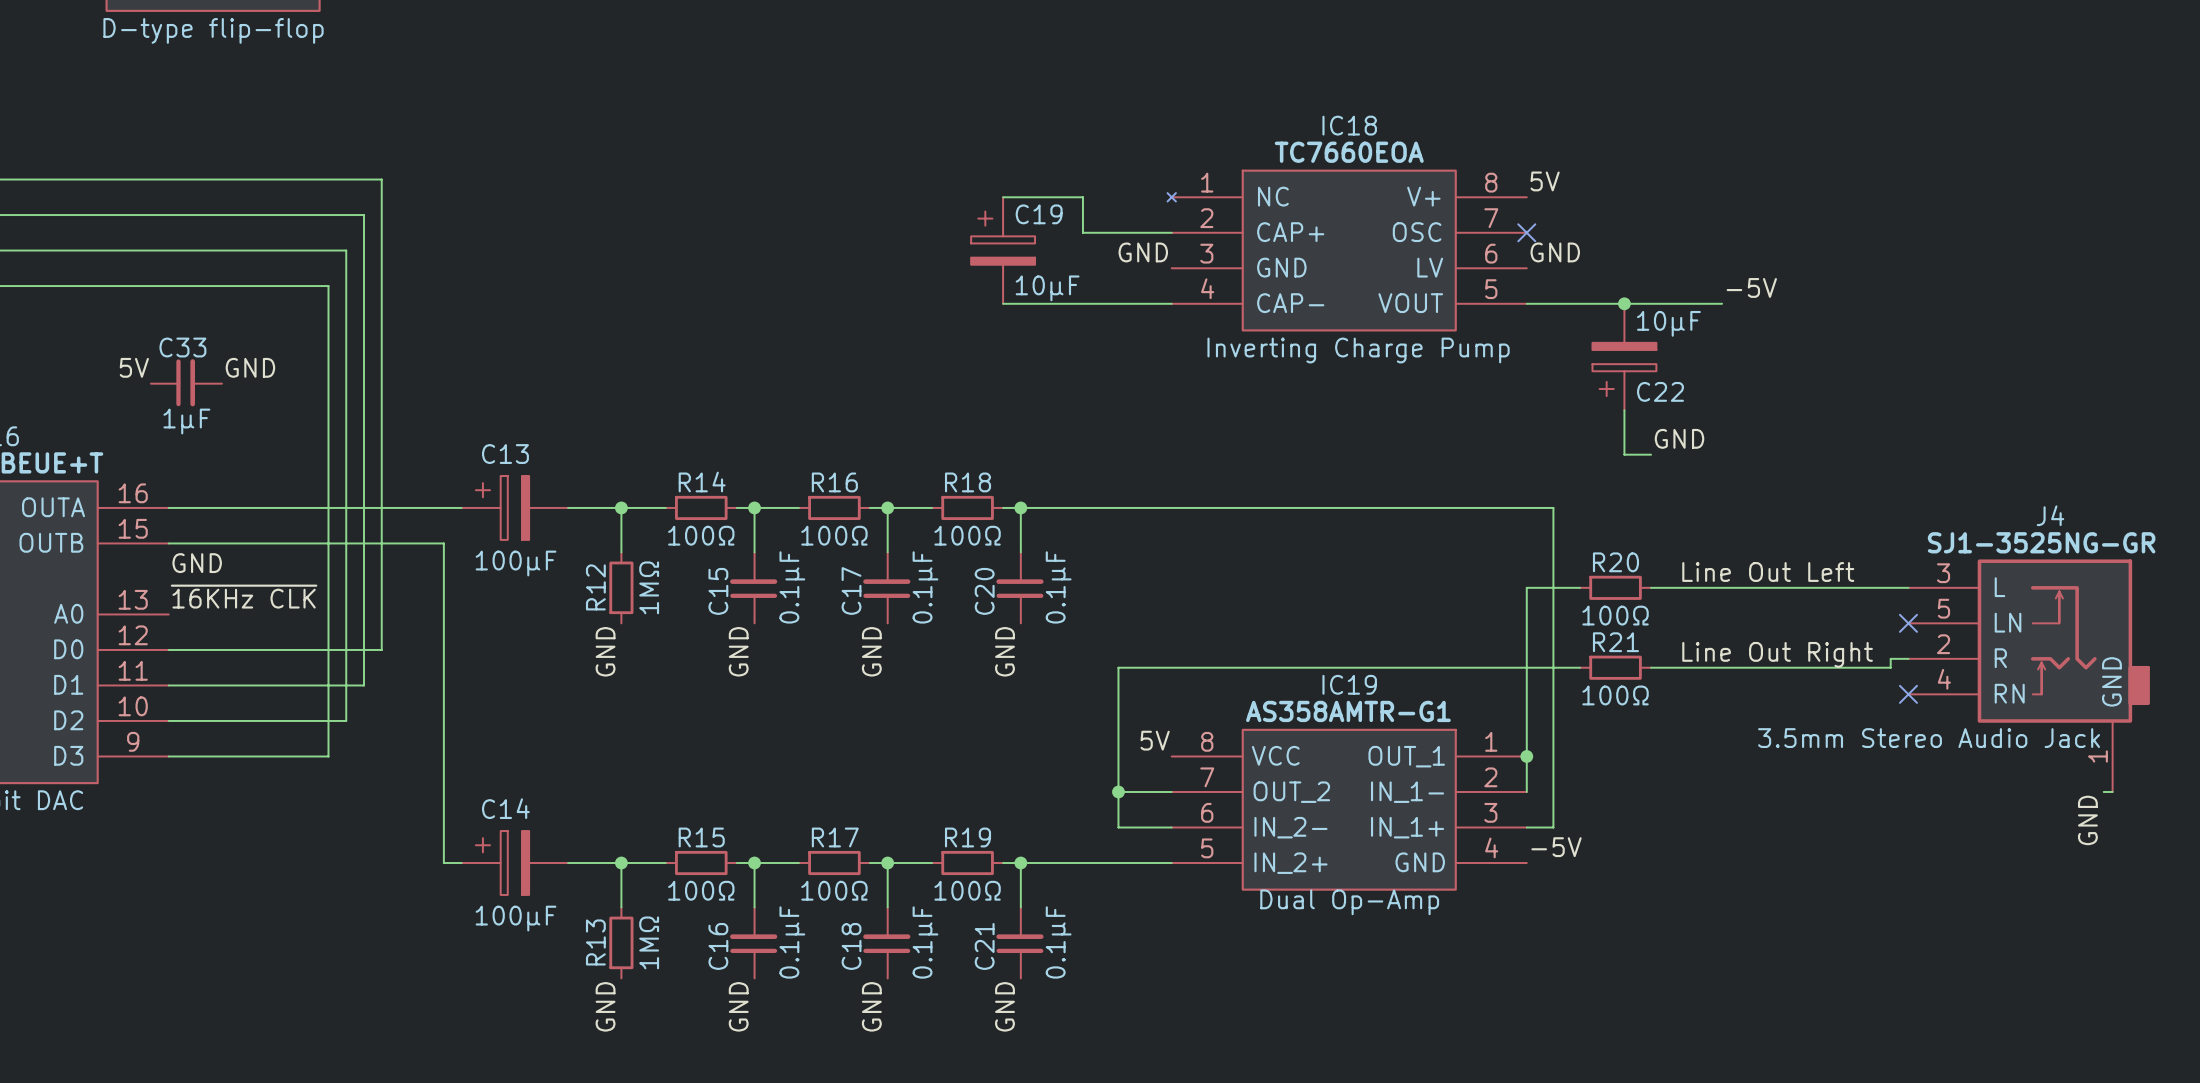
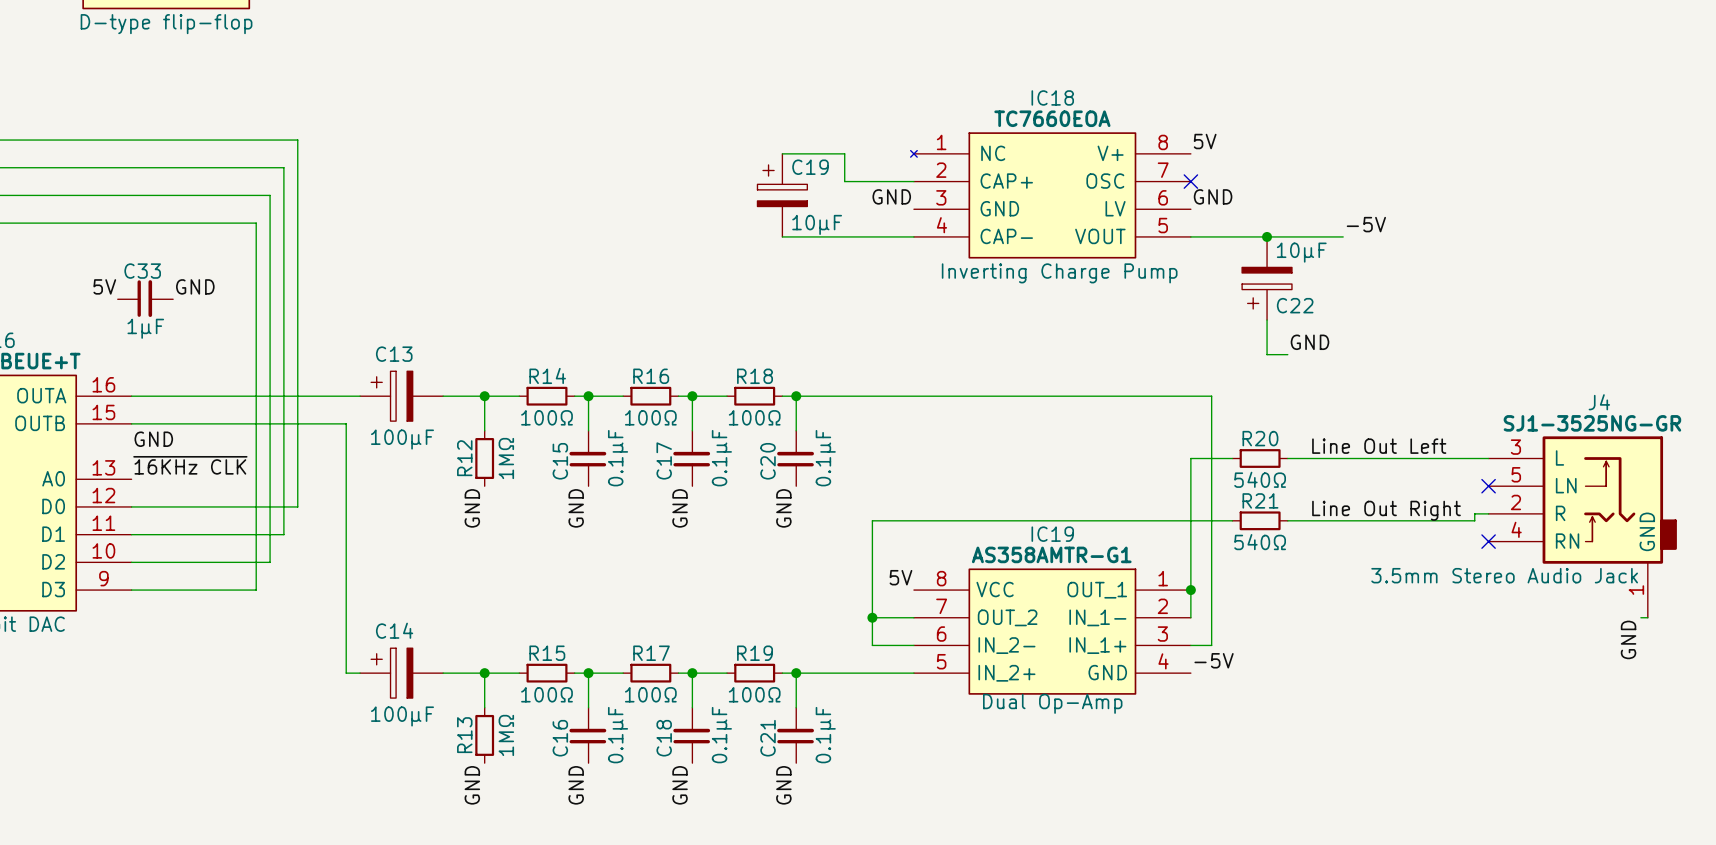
R20 text: 100Ω (1615, 615) -> 540Ω (1260, 479)
R21 text: 100Ω (1615, 695) -> 540Ω (1260, 542)

